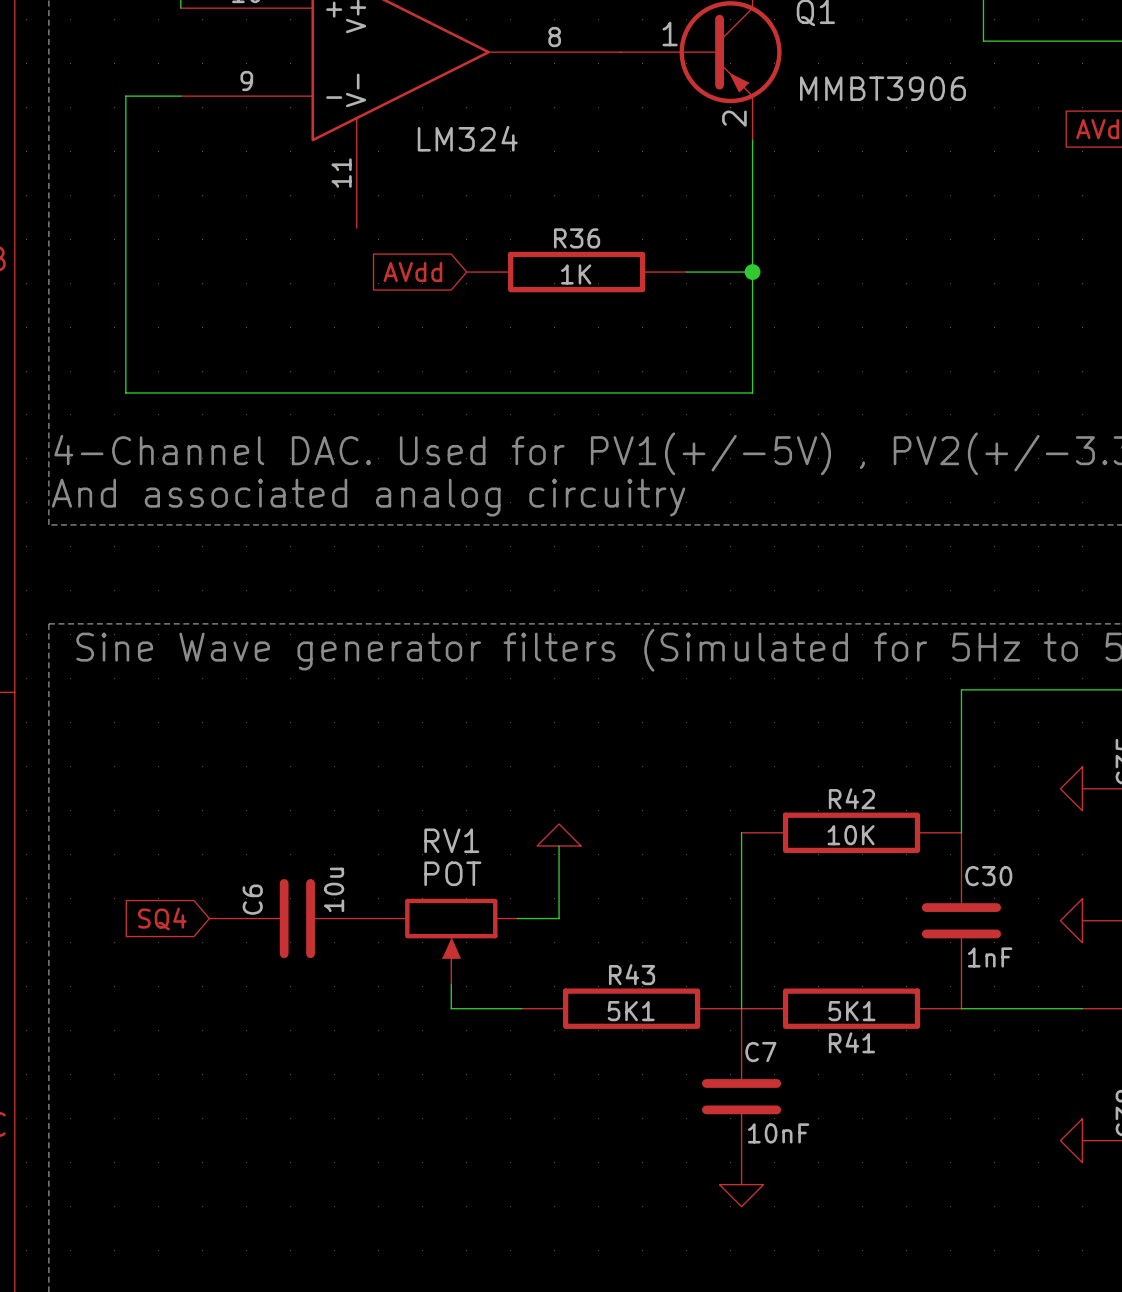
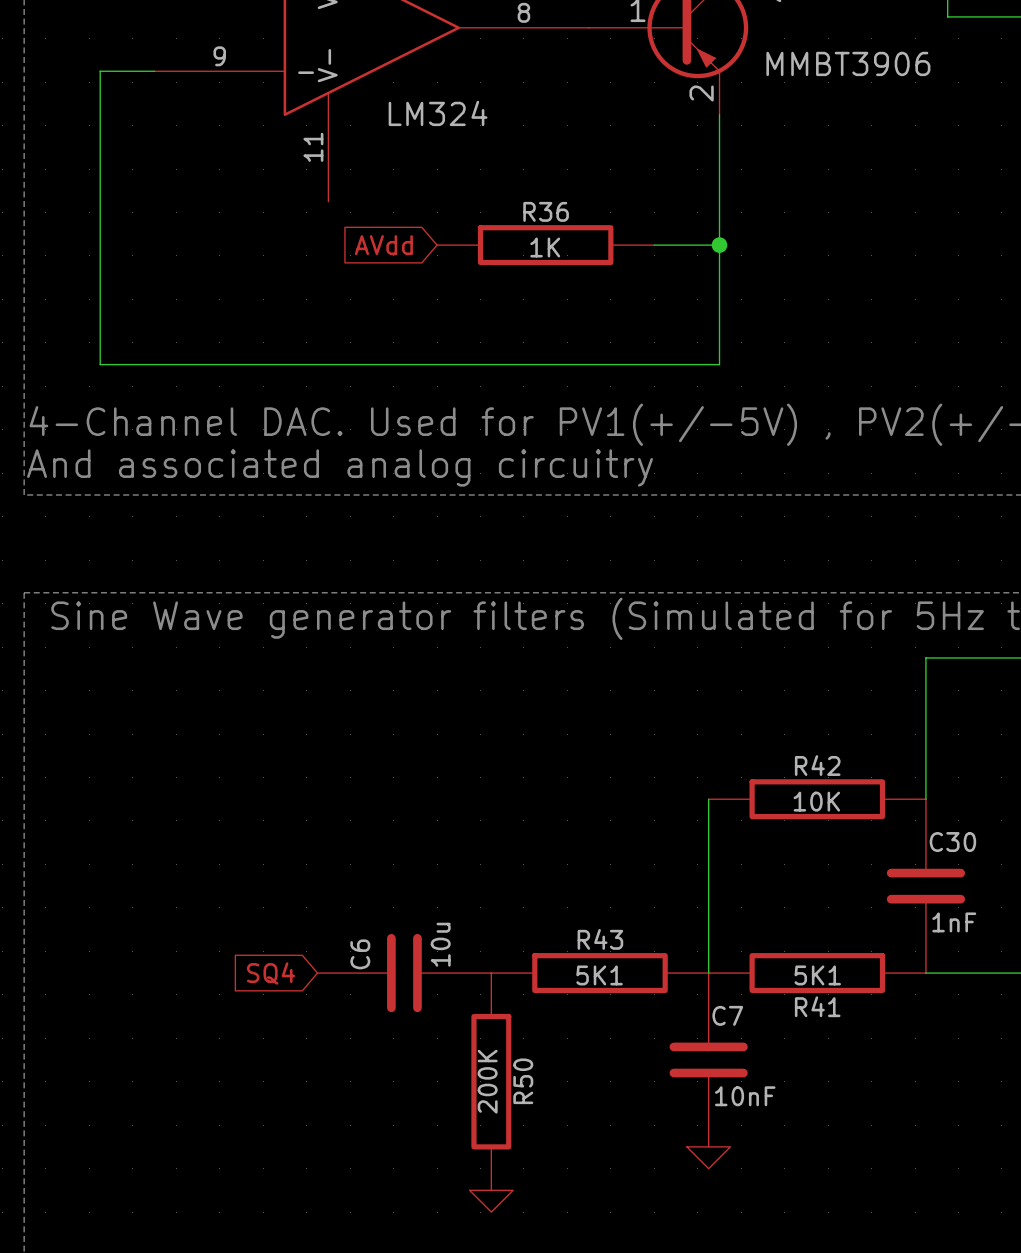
power symbol rotation: 0° (559, 834) -> 180° (491, 1201)
power symbol position: (559, 834) -> (491, 1201)
wire: (559, 845) (559, 918) (517, 918) -> none
global label position: SQ4 (162, 918) -> SQ4 (270, 973)
C6 position: (297, 918) -> (404, 973)
RV1: POT (451, 941) -> none
R50: none -> 200K (491, 1081)

